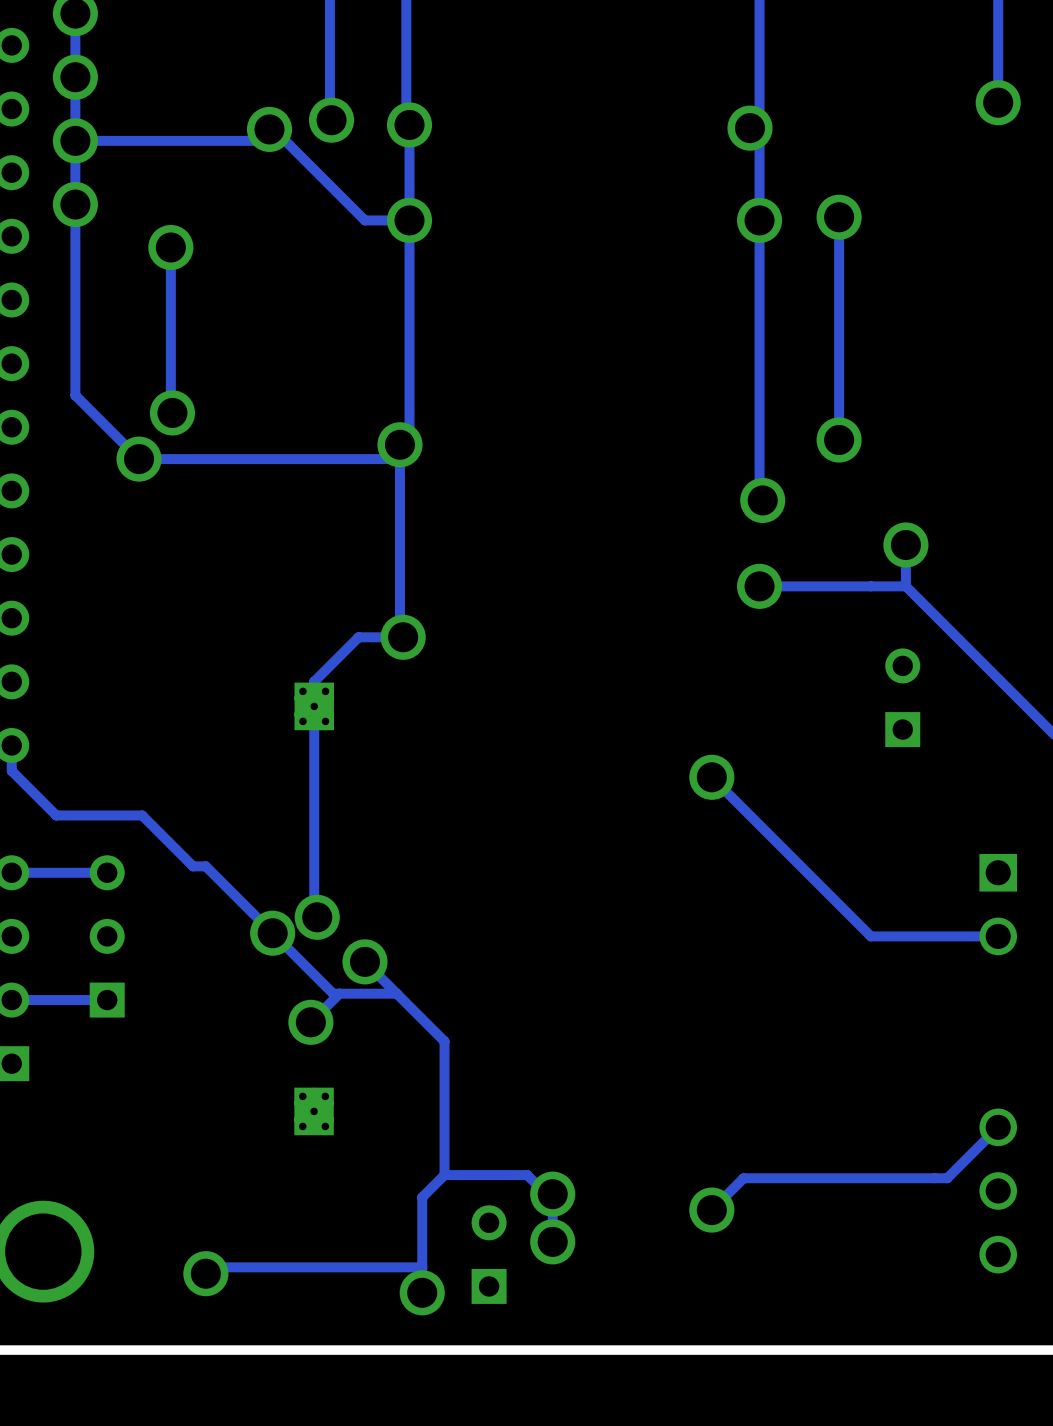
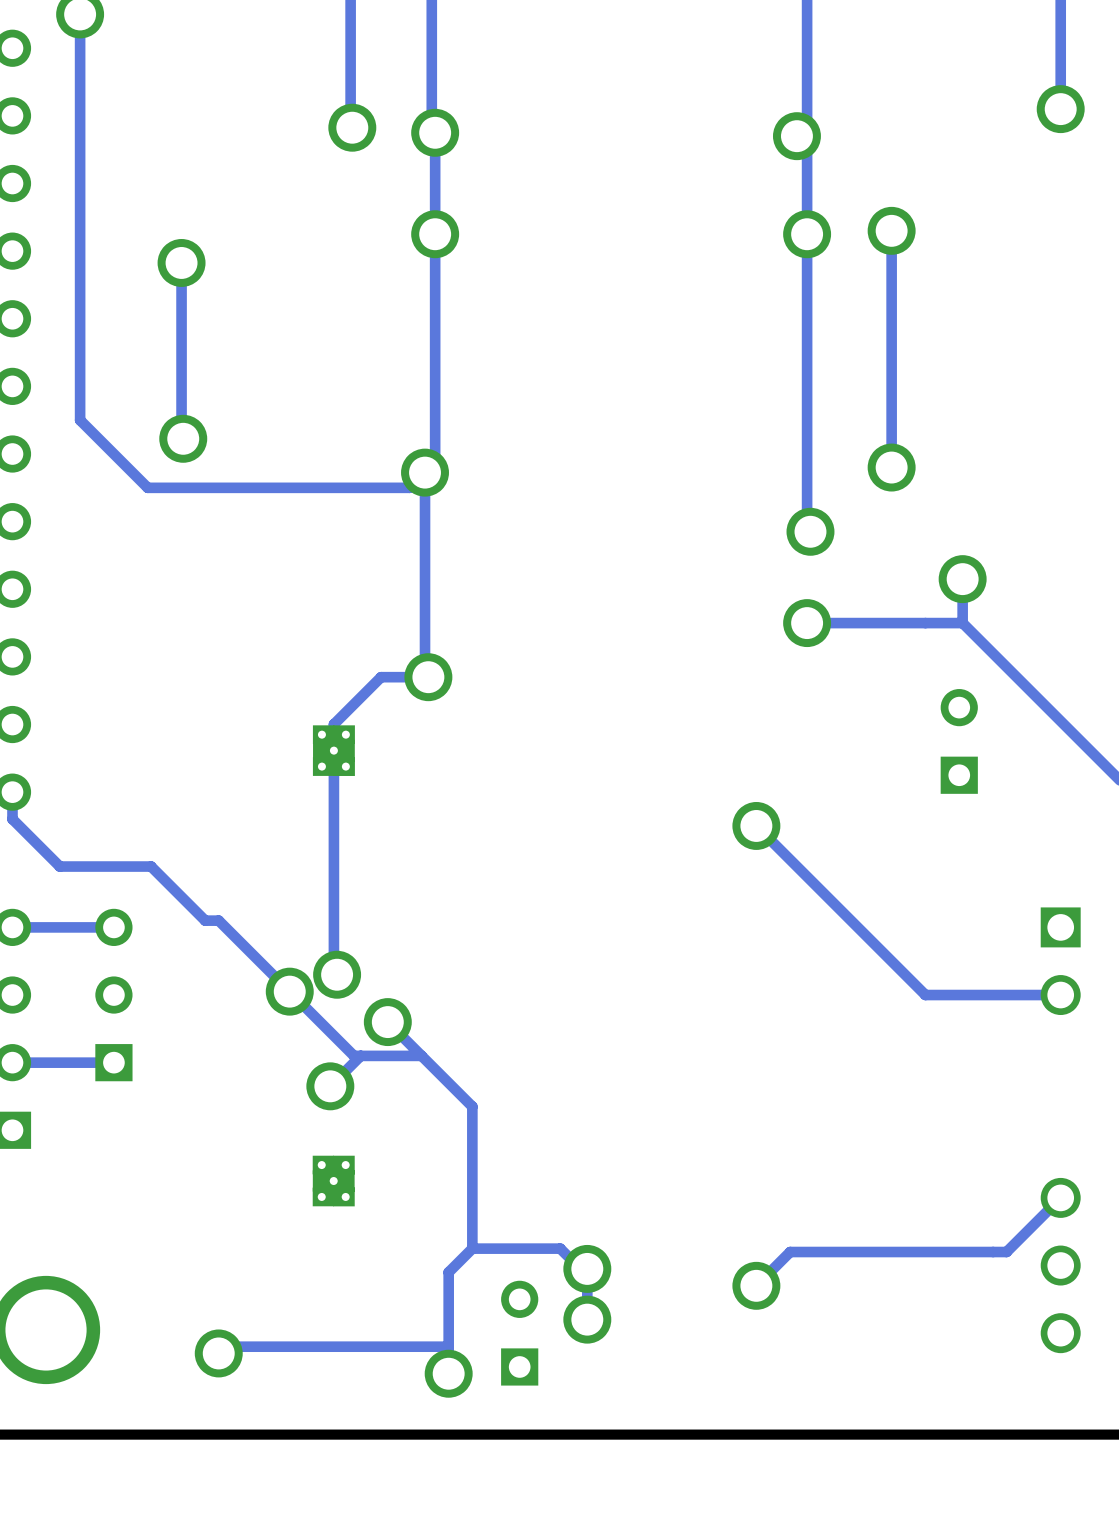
via: (75, 77) -> none
via: (269, 129) -> none
track: (75, 140) (258, 140) (269, 129) (273, 129) (364, 220) (409, 220) -> none
via: (75, 140) -> none
via: (75, 204) -> none
via: (139, 459) -> none

